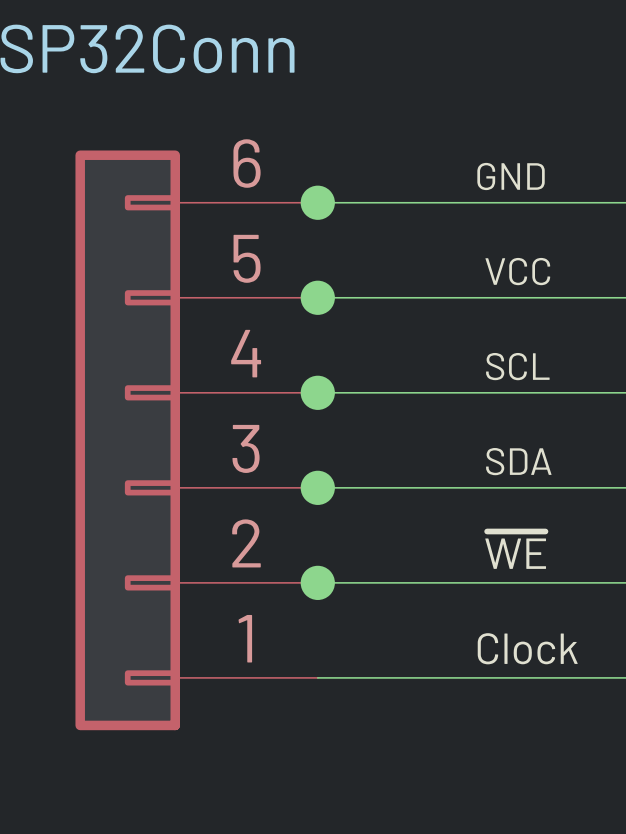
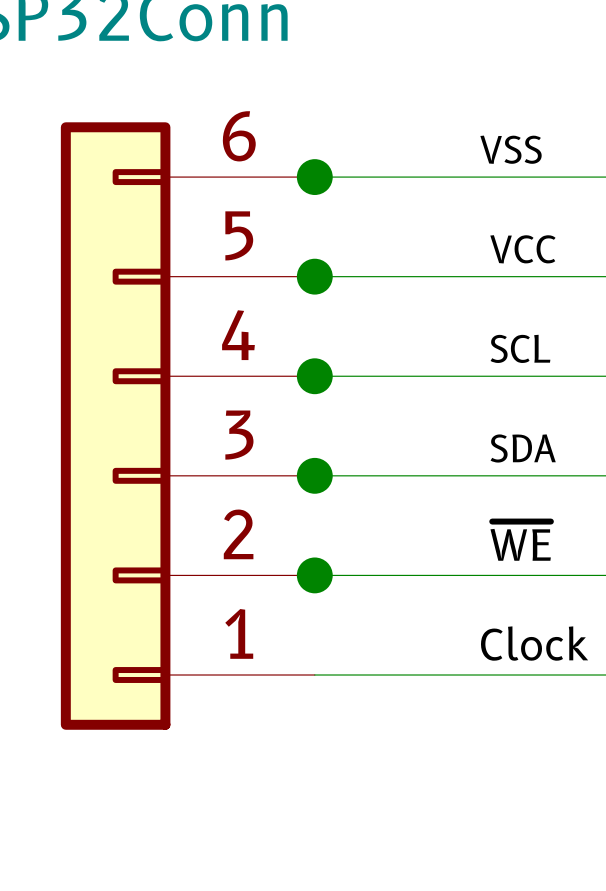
label: GND (511, 176) -> VSS (511, 149)

